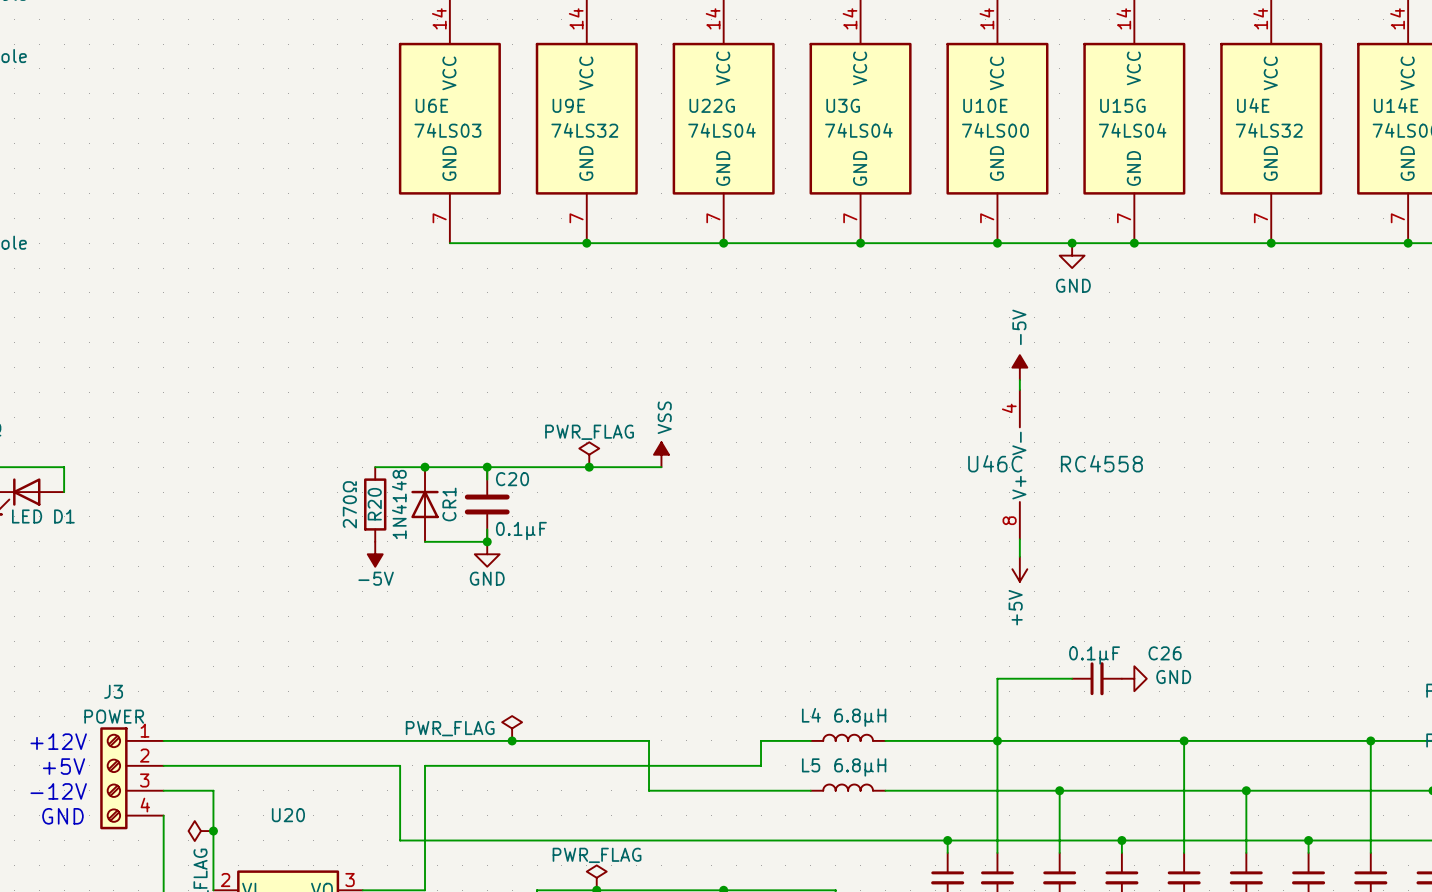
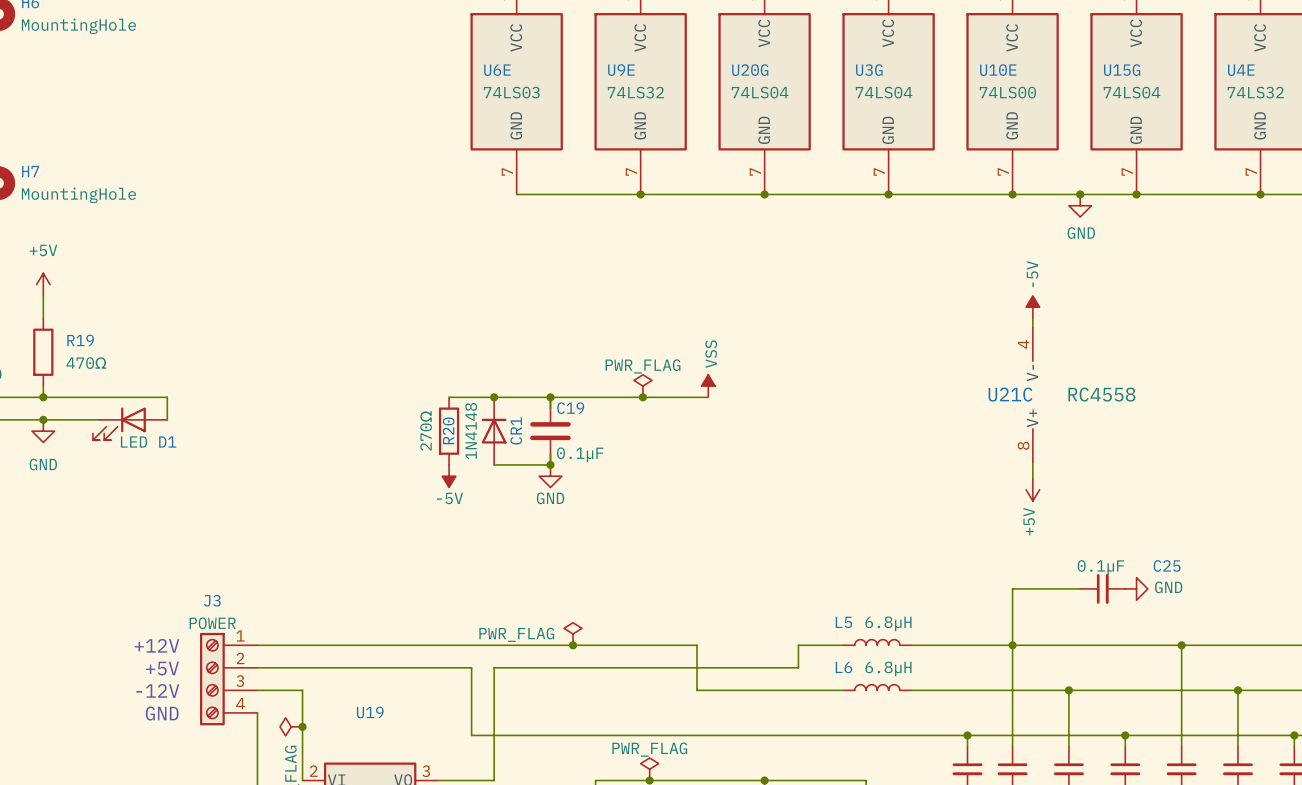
U22G name: U22G (712, 105) -> U20G (750, 70)
U46C name: U46C (995, 463) -> U21C (1010, 394)
C20 name: C20 (512, 479) -> C19 (570, 408)
C26 name: C26 (1165, 653) -> C25 (1167, 565)
L4 name: L4 (811, 715) -> L5 (843, 622)
L5 name: L5 (811, 765) -> L6 (843, 667)
U20 name: U20 (288, 815) -> U19 (370, 712)

